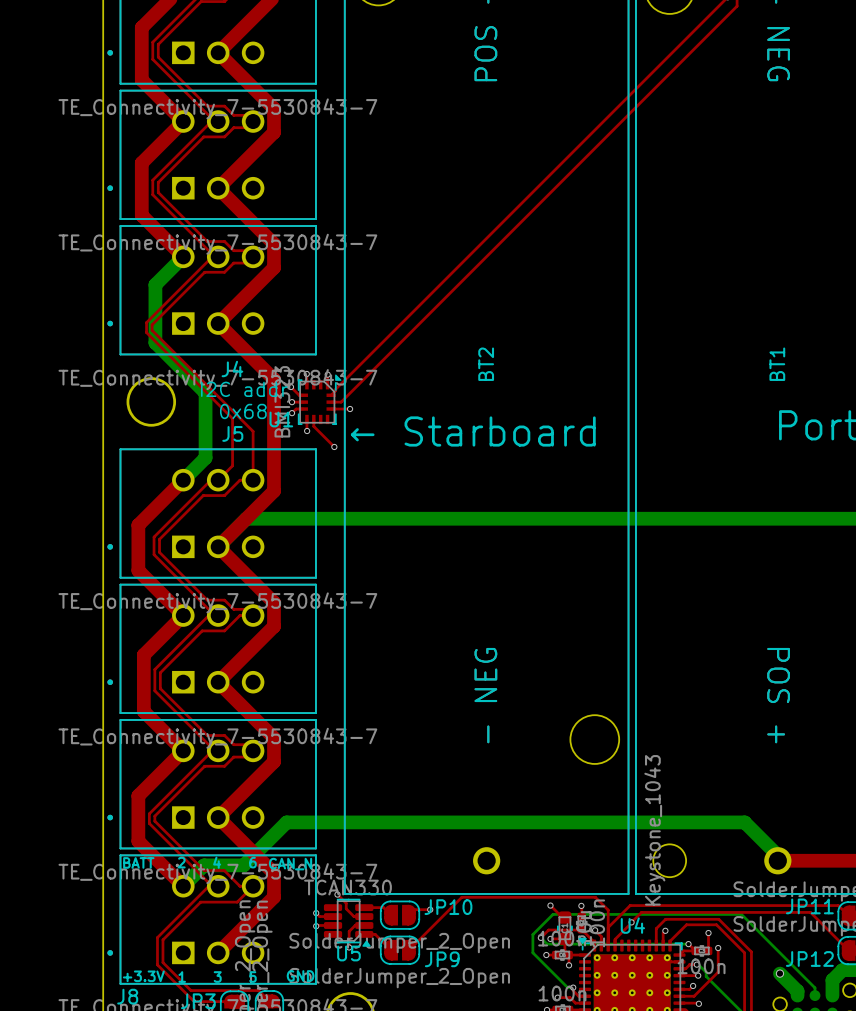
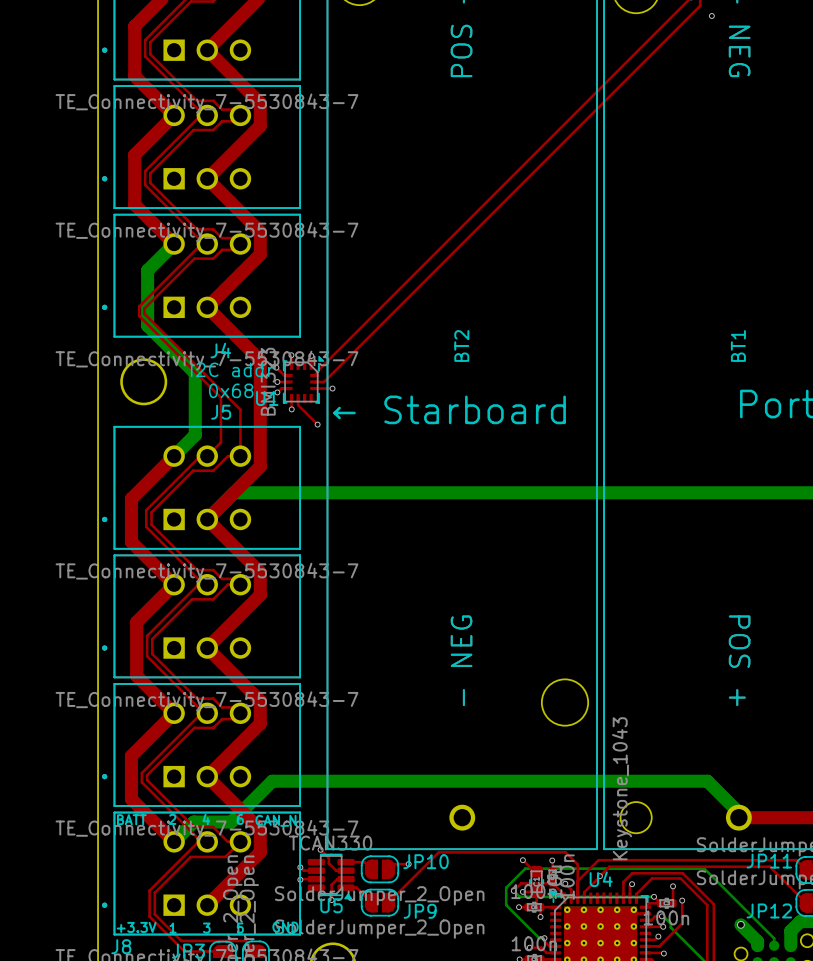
via: none -> (711, 15)

